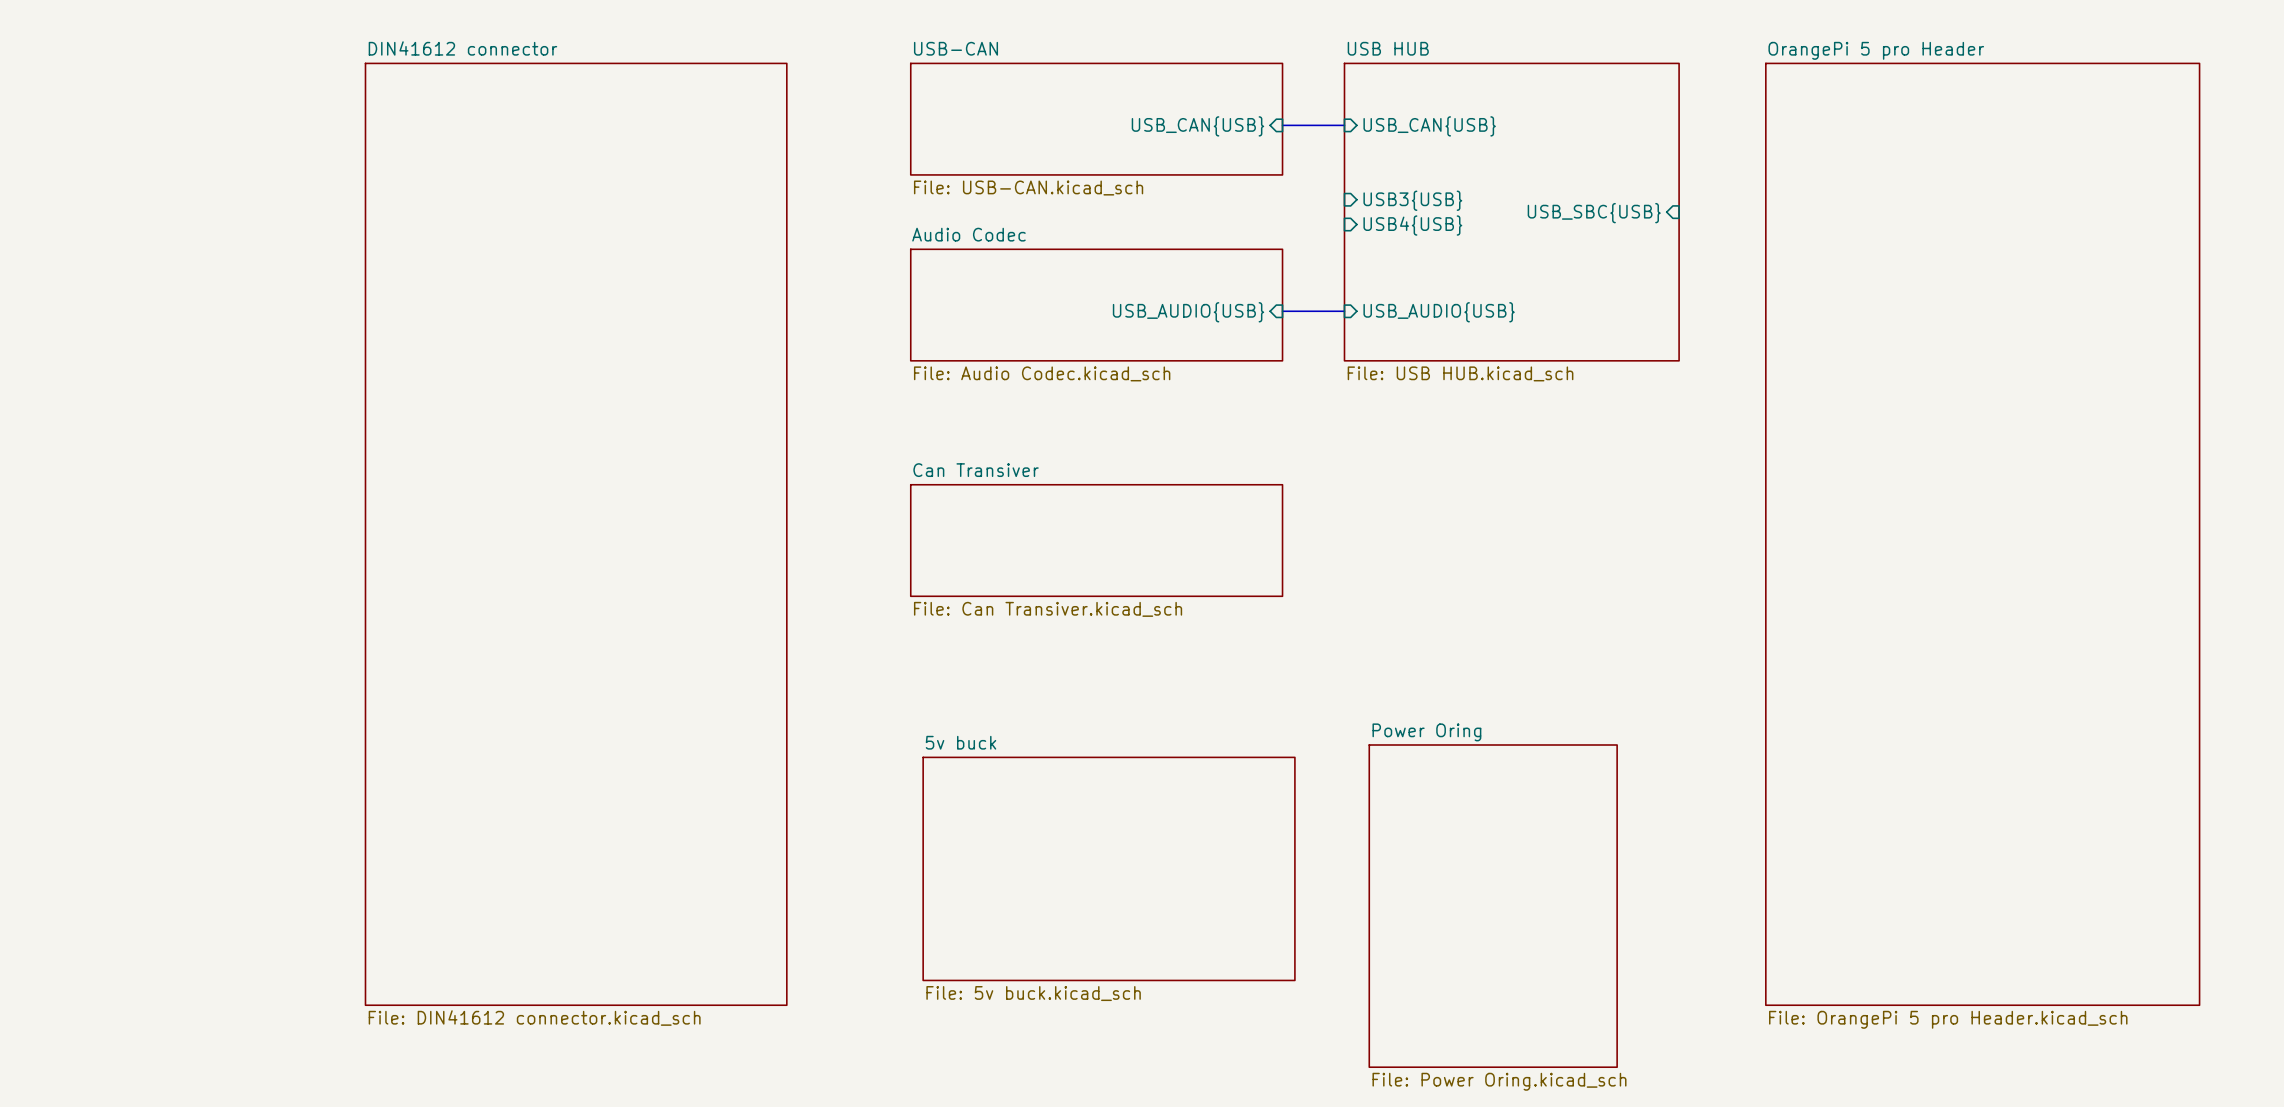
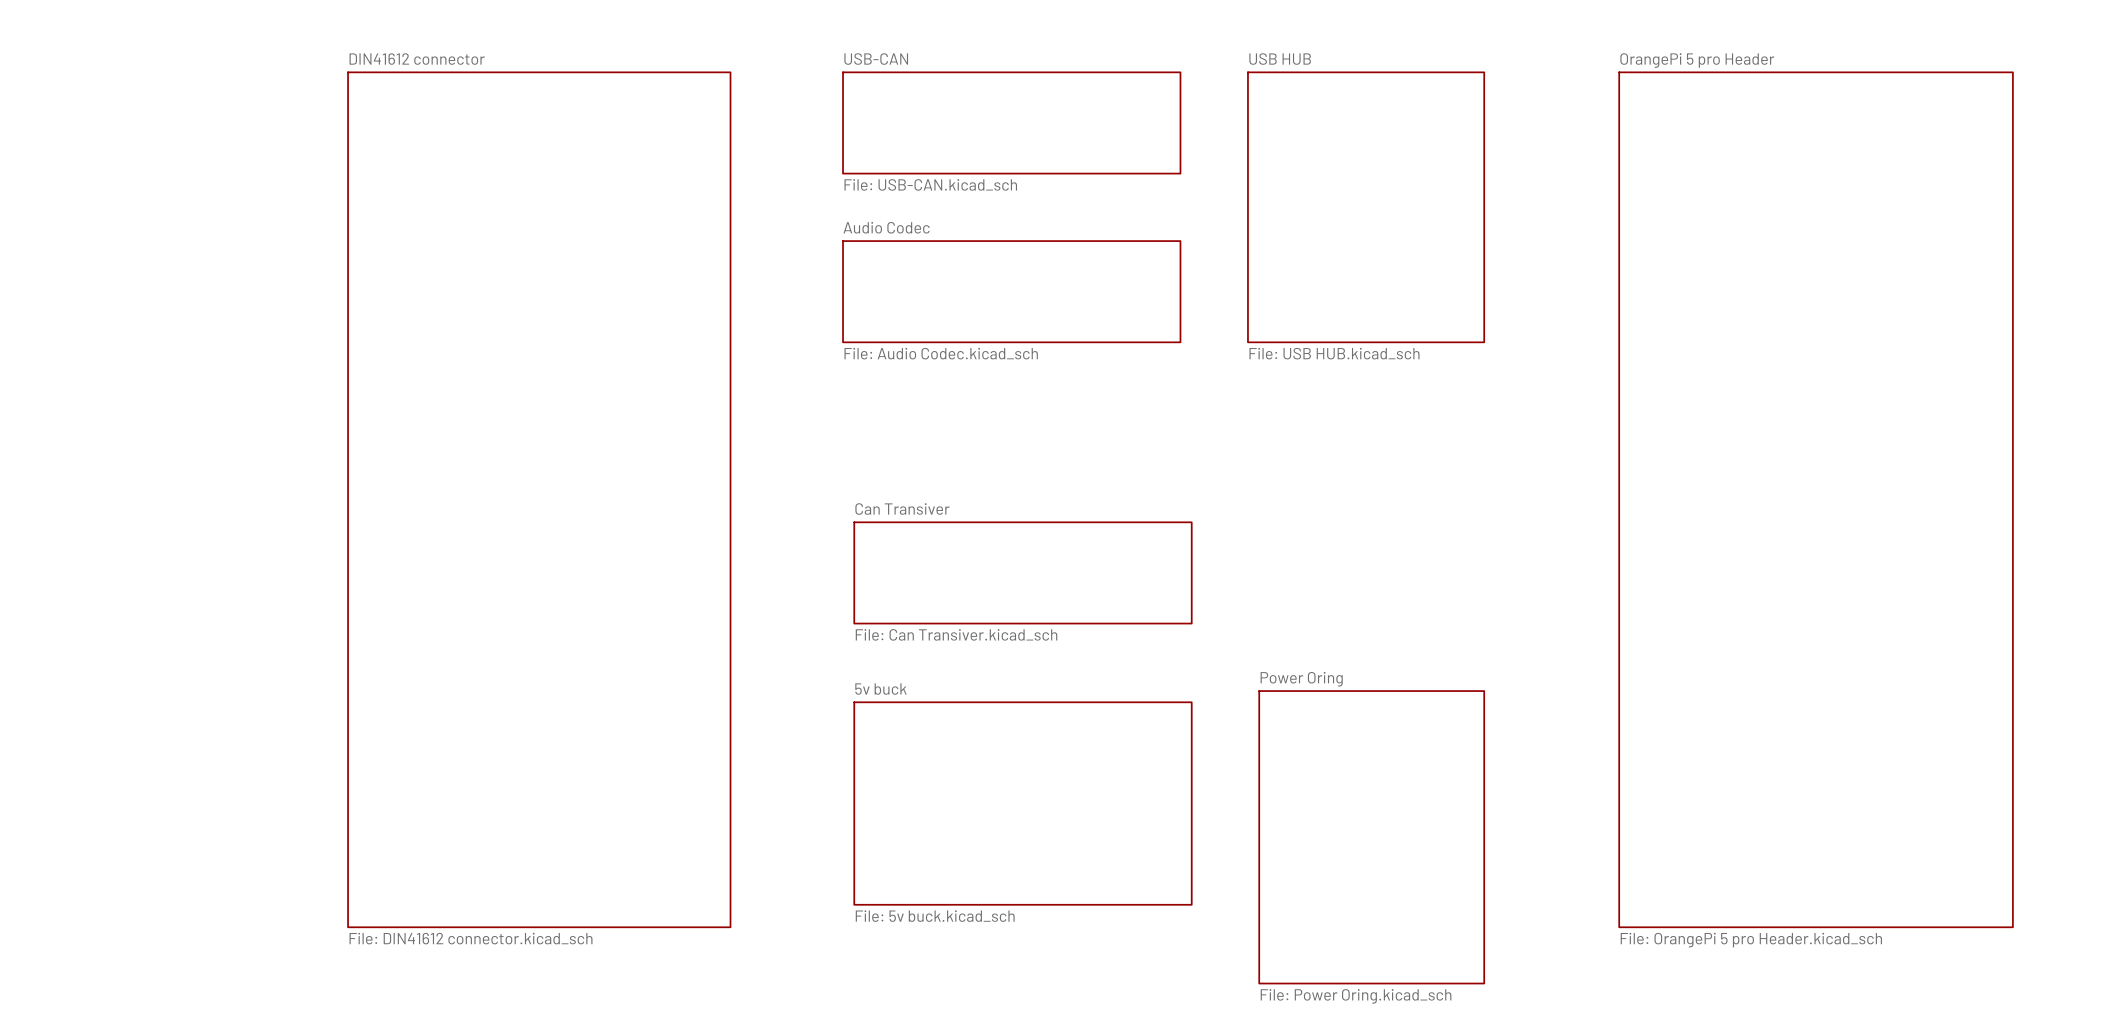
bus: (1282, 125) (1344, 125) -> none
sheet pin: USB_CAN{USB} (1197, 126) -> none
sheet pin: USB_CAN{USB} (1429, 126) -> none
sheet pin: USB3{USB} (1412, 200) -> none
sheet USB HUB: none -> File: USB HUB.kicad_sch (1366, 207)
sheet USB HUB: File: USB HUB.kicad_sch (1511, 212) -> none
sheet pin: USB_SBC{USB} (1594, 213) -> none
sheet pin: USB4{USB} (1412, 225) -> none
bus: (1282, 311) (1344, 311) -> none
sheet pin: USB_AUDIO{USB} (1188, 312) -> none
sheet pin: USB_AUDIO{USB} (1439, 312) -> none
sheet Can Transiver position: (1096, 540) -> (1022, 572)

